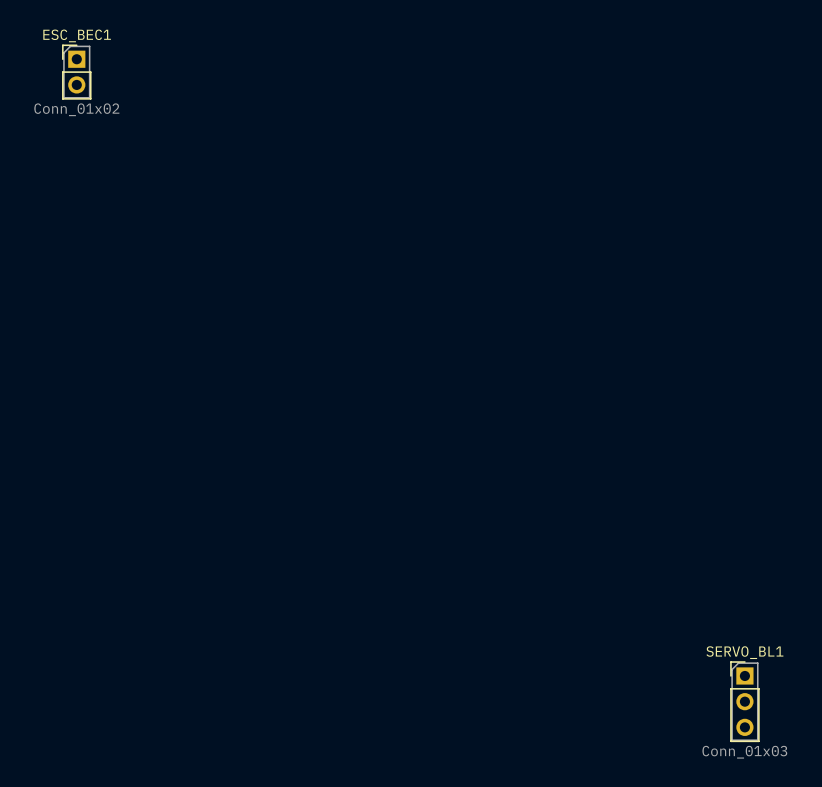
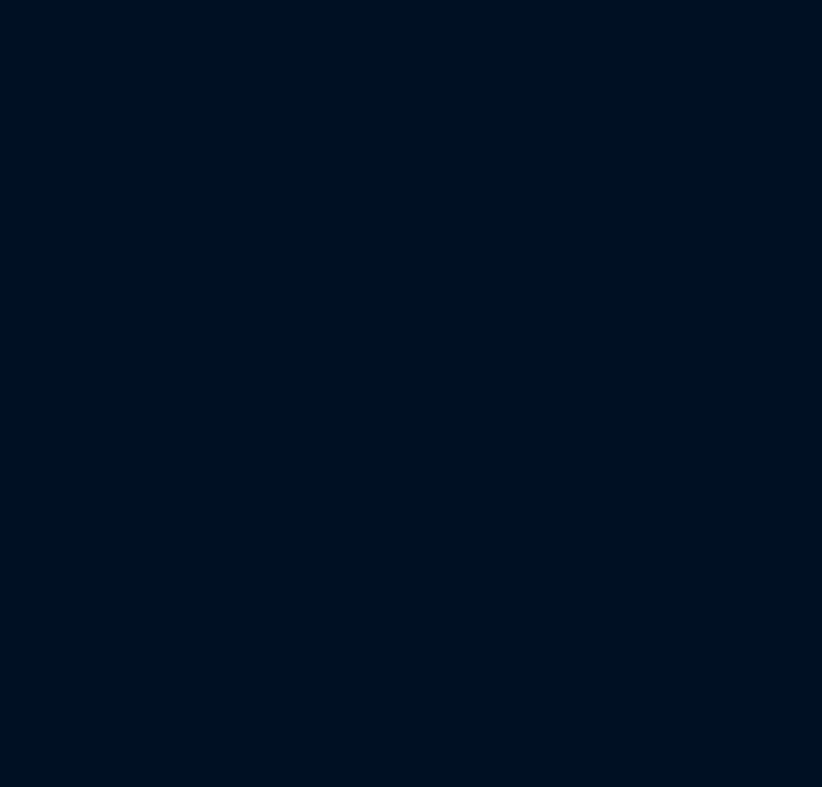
ESC_BEC1: Conn_01x02 (76, 72) -> none
SERVO_BL1: Conn_01x03 (744, 701) -> none

